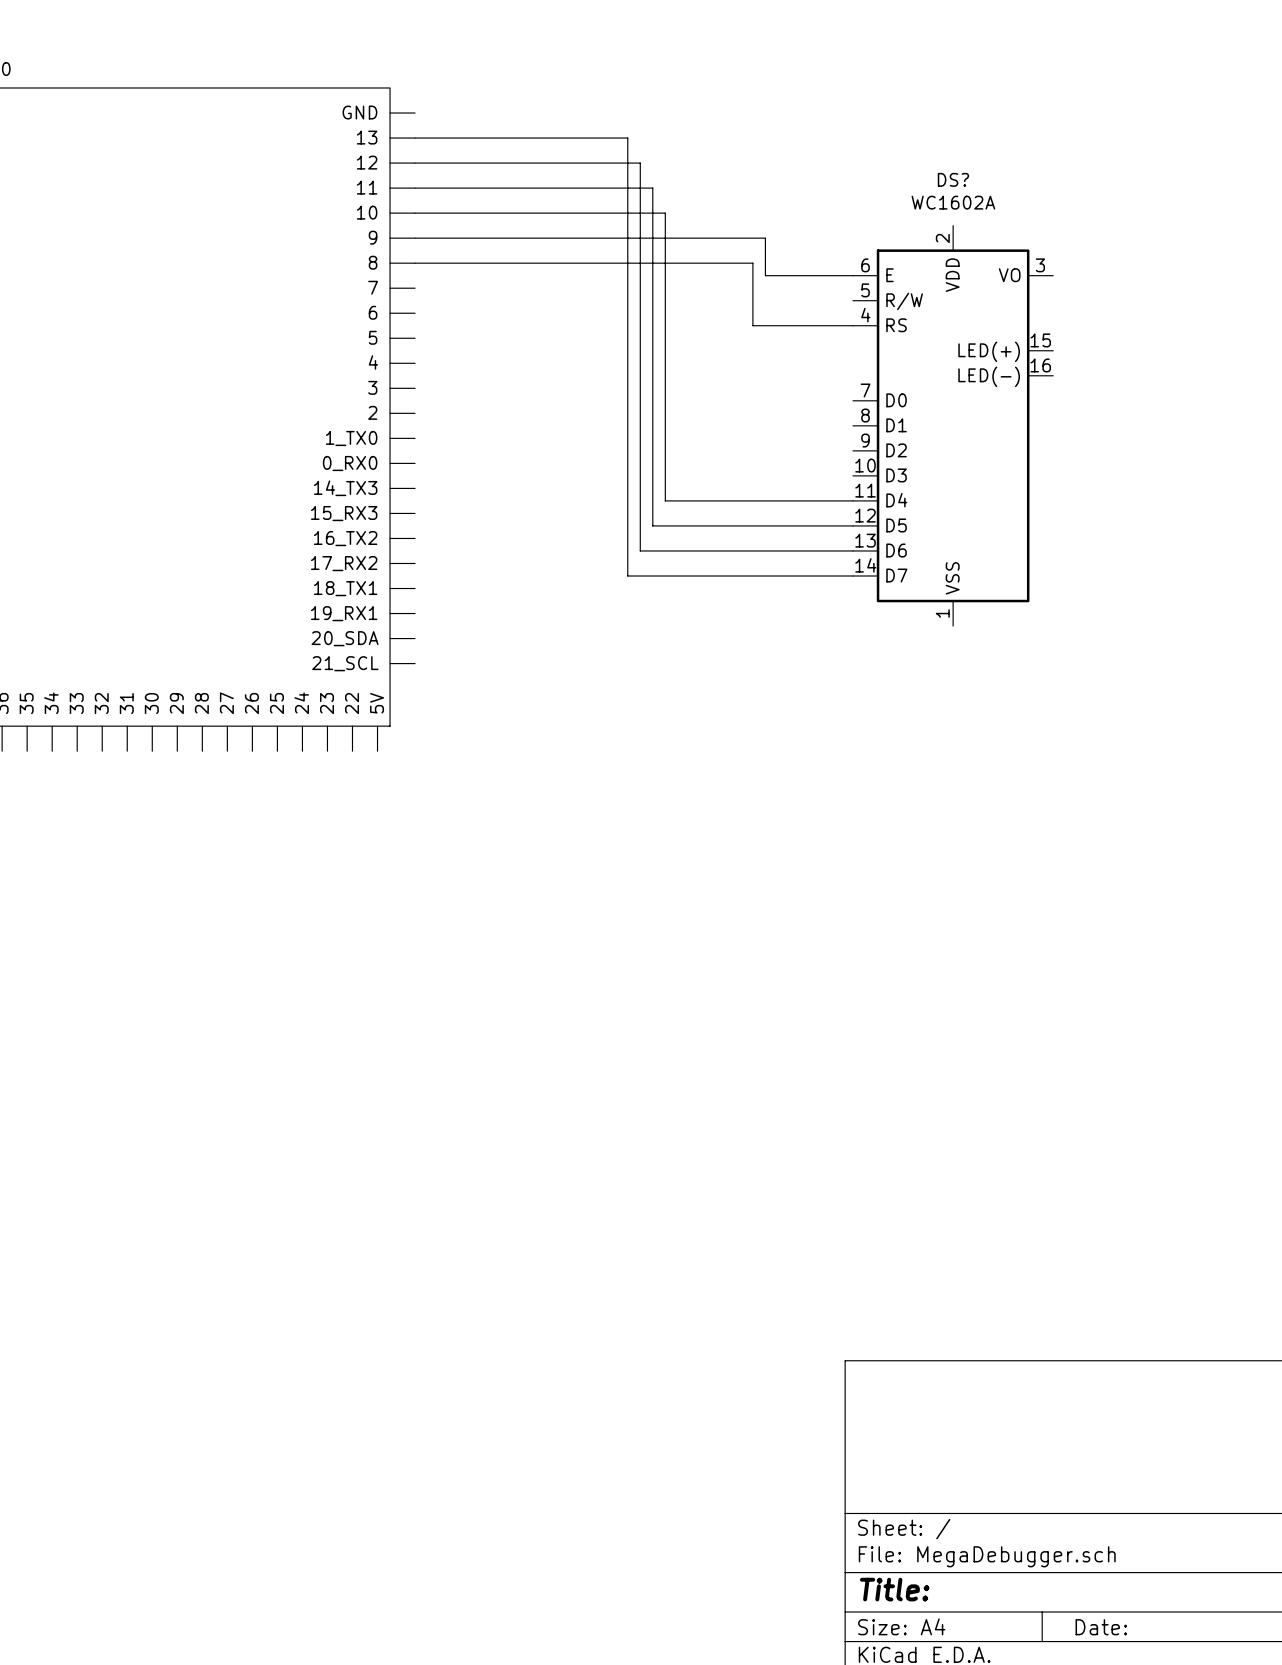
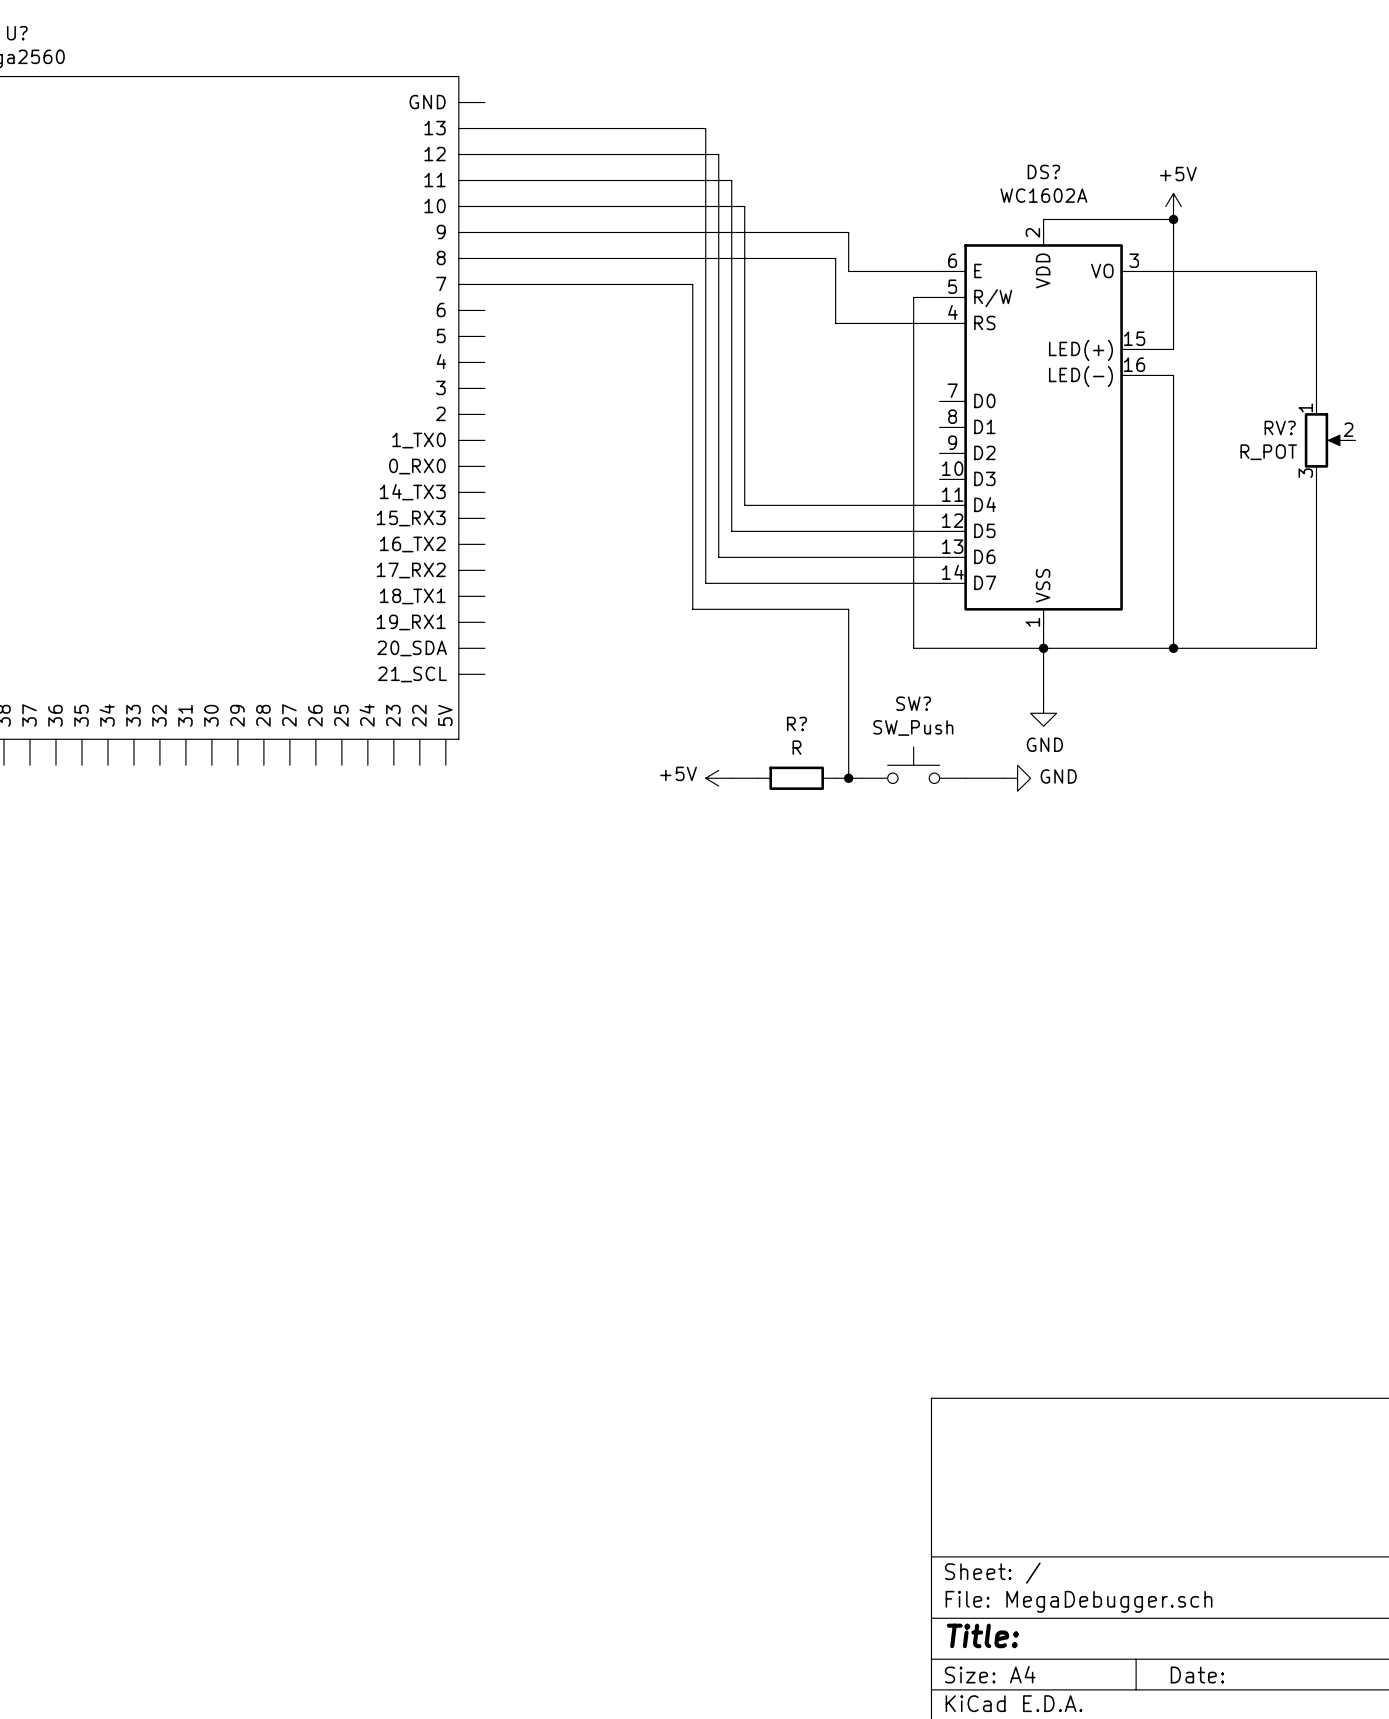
power symbol: none -> +5V (1173, 206)
wire: none -> (1043, 219) (1173, 219) (1173, 349) (1147, 349)
junction: none -> (1173, 219)
wire: none -> (1147, 271) (1316, 271) (1316, 401)
wire: none -> (484, 284) (692, 284) (692, 609) (848, 609) (848, 778)
wire: none -> (939, 297) (913, 297) (913, 648) (1316, 648) (1316, 479)
wire: none -> (1147, 375) (1173, 375) (1173, 648)
RV?: none -> R_POT (1330, 440)
wire: none -> (1043, 635) (1043, 700)
junction: none -> (1043, 648)
junction: none -> (1173, 648)
power symbol: none -> GND (1043, 713)
SW?: none -> SW_Push (913, 765)
power symbol: none -> +5V (718, 778)
wire: none -> (731, 778) (757, 778)
R?: none -> R (796, 778)
wire: none -> (835, 778) (861, 778)
junction: none -> (848, 778)
wire: none -> (965, 778) (1004, 778)
power symbol: none -> GND (1017, 778)

